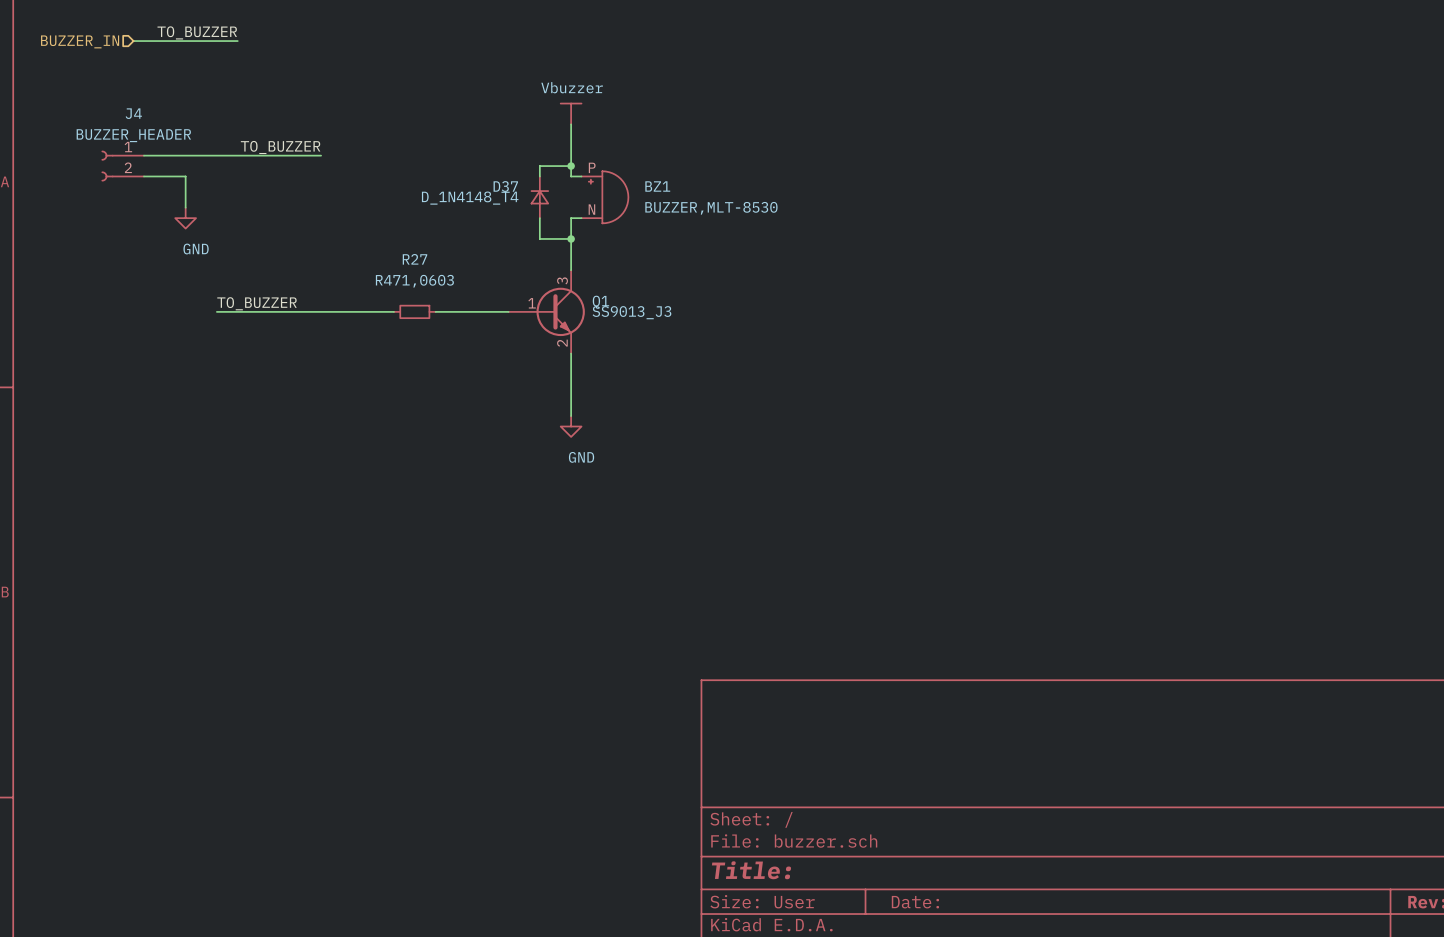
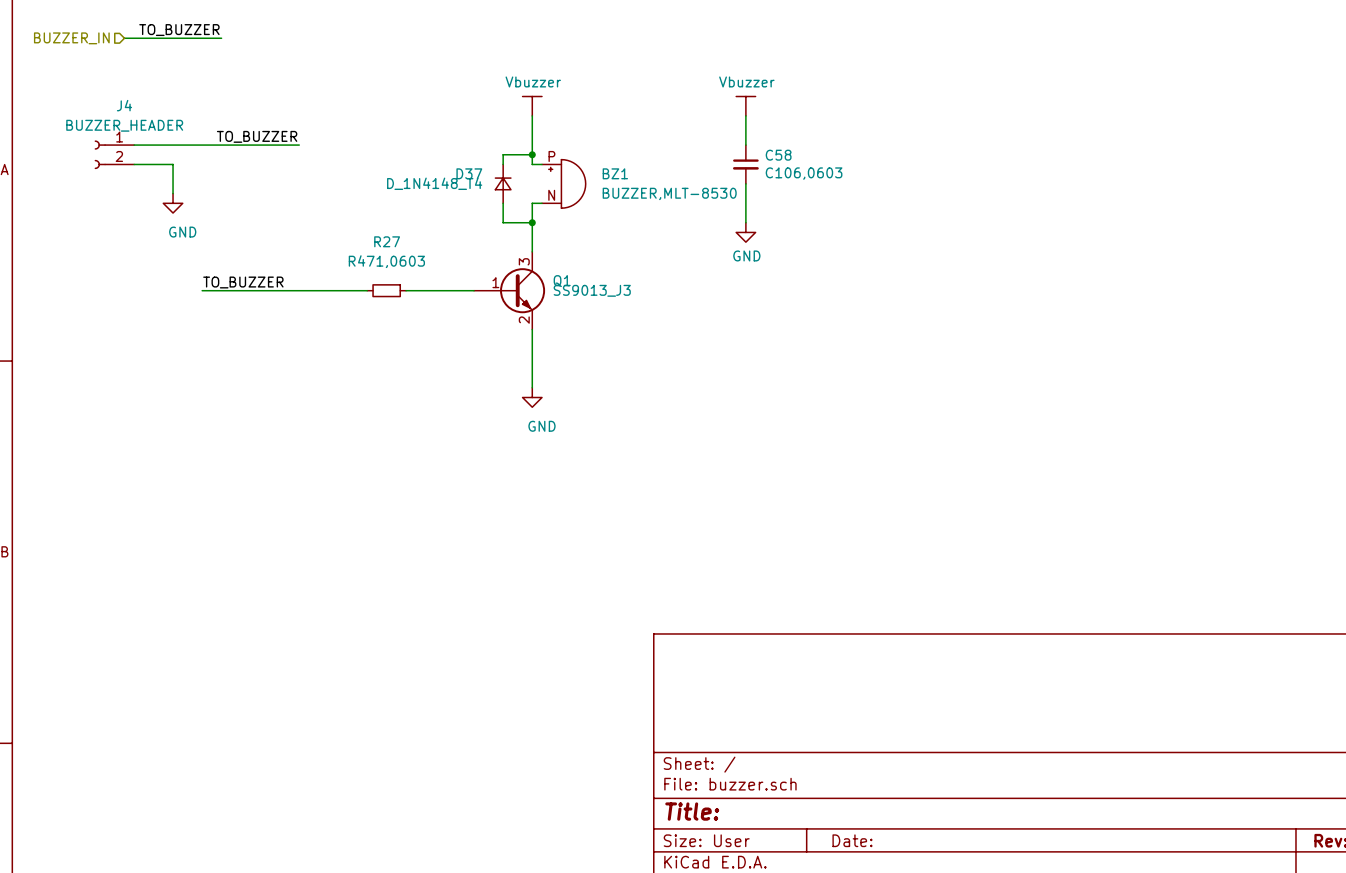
power symbol: none -> Vbuzzer (745, 106)
wire: none -> (745, 115) (745, 145)
C58: none -> C106,0603 (745, 164)
wire: none -> (745, 183) (745, 222)
power symbol: none -> GND (745, 232)

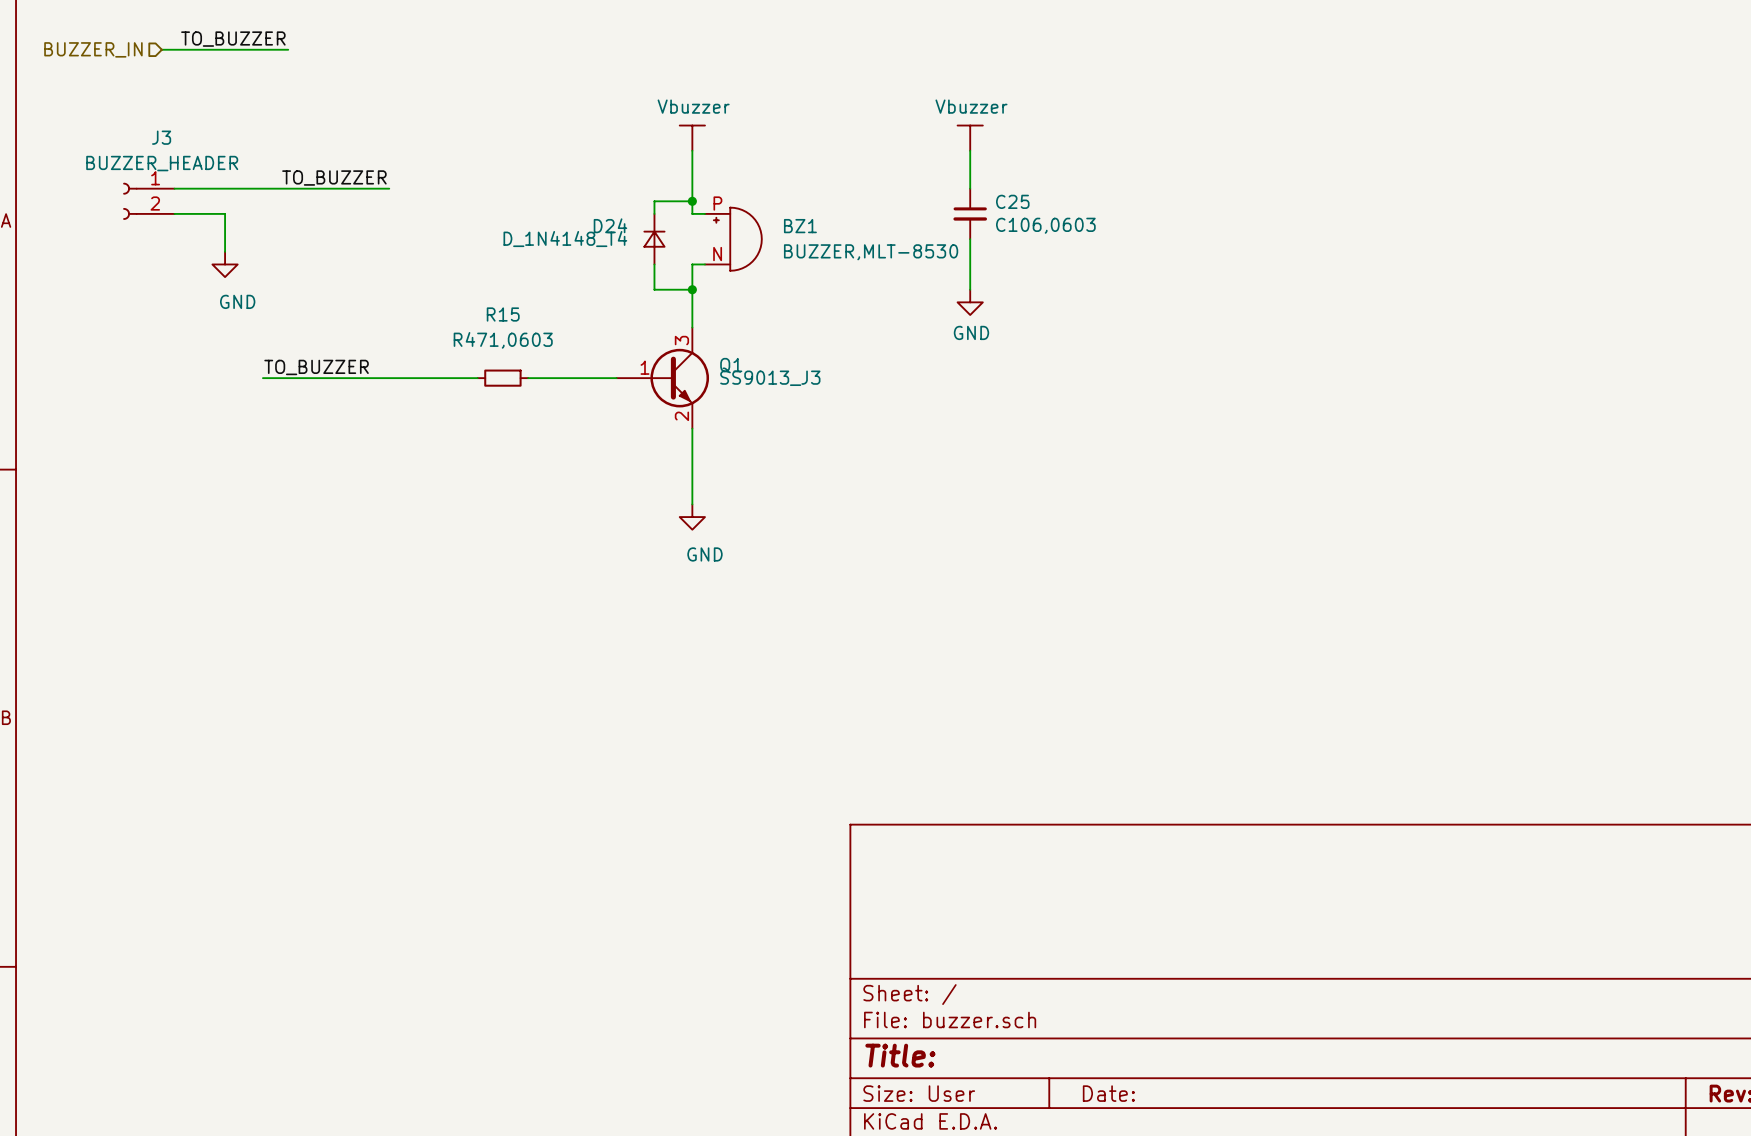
J4 name: J4 (124, 105) -> J3 (161, 137)
C58 name: C58 (778, 155) -> C25 (1012, 201)
D37 name: D37 (469, 173) -> D24 (610, 225)
R27 name: R27 (387, 241) -> R15 (503, 314)

